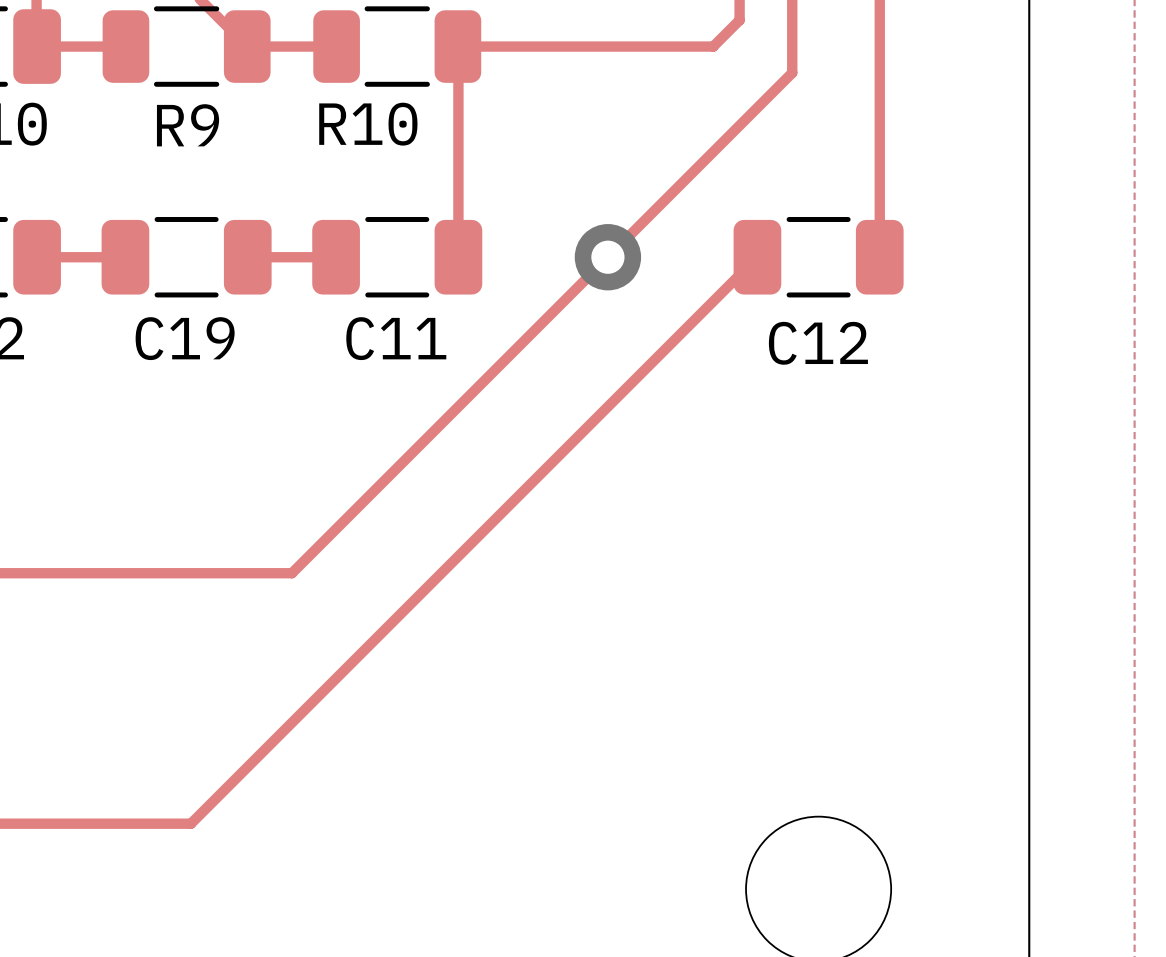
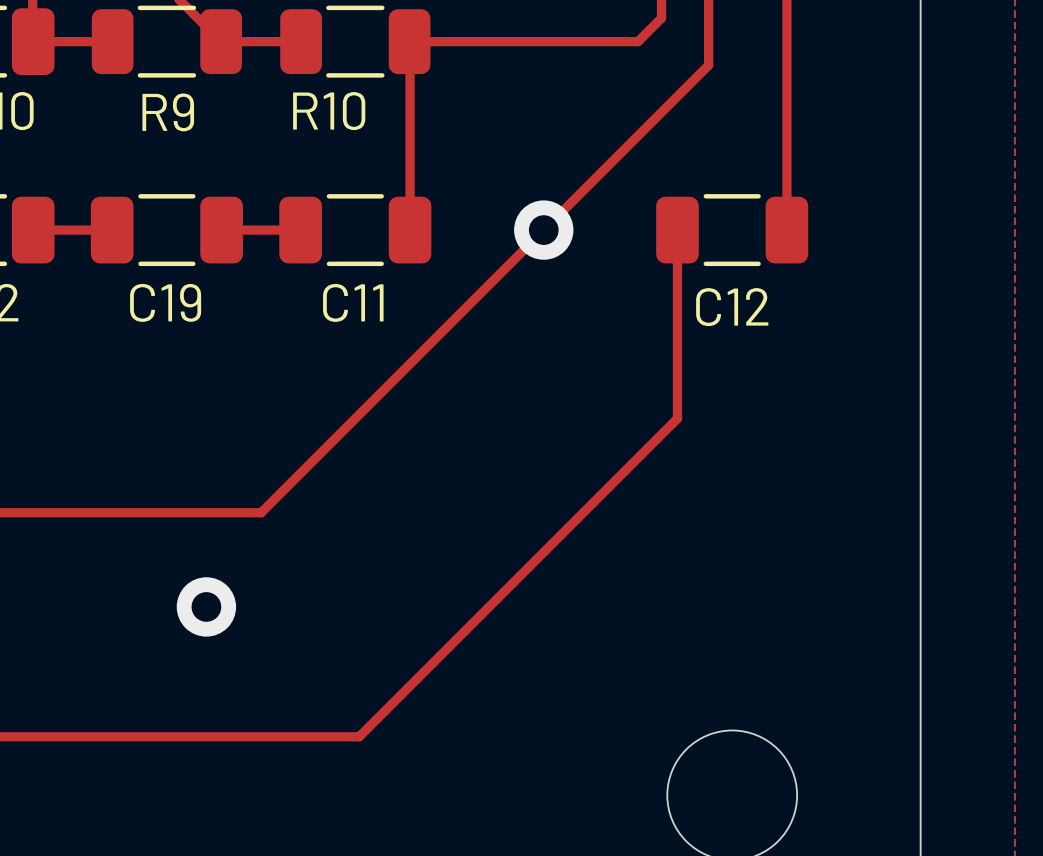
top track: (757, 257) (190, 823) -> (677, 230) (677, 418) (359, 736) (170, 736)
via: none -> (206, 606)

